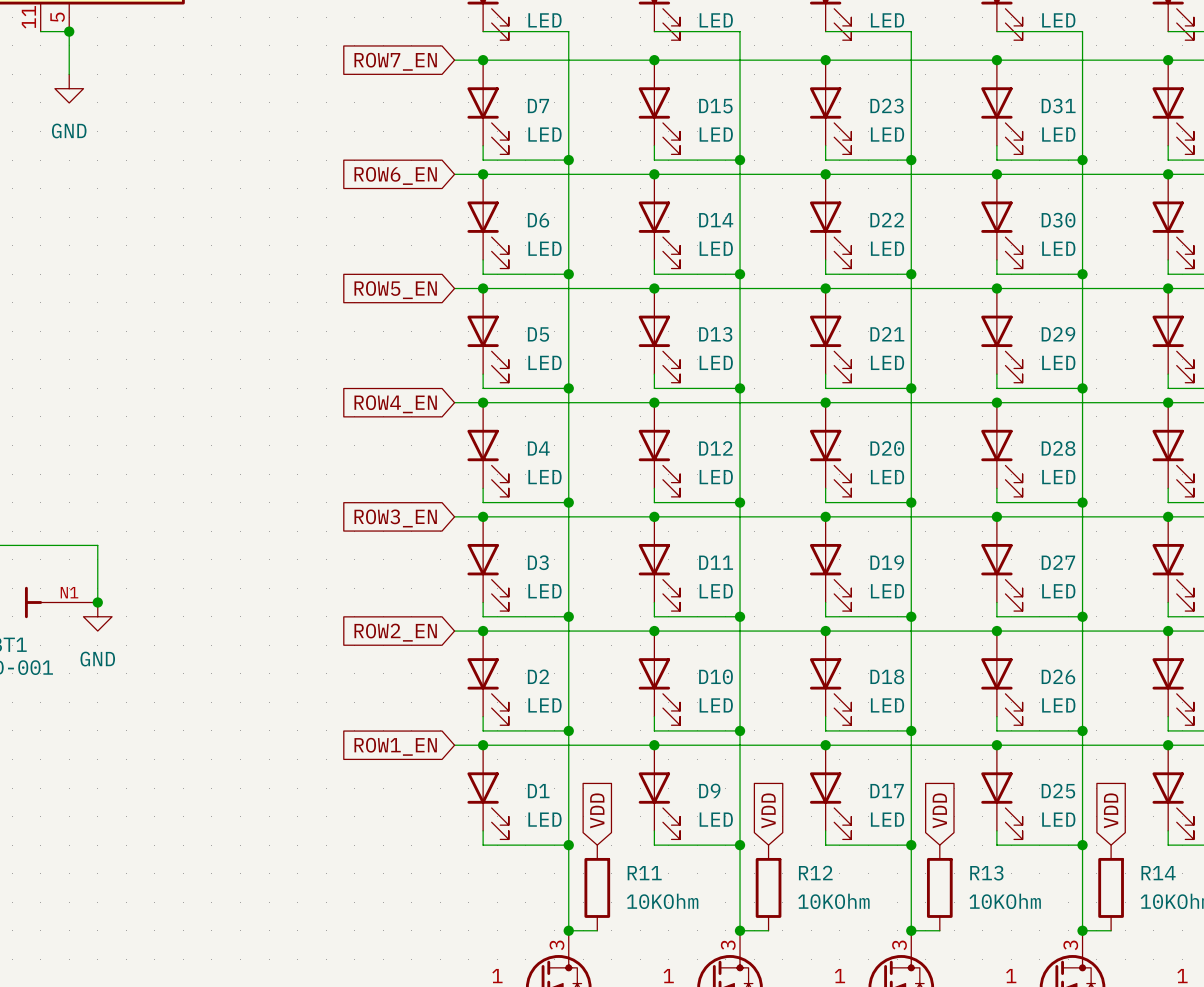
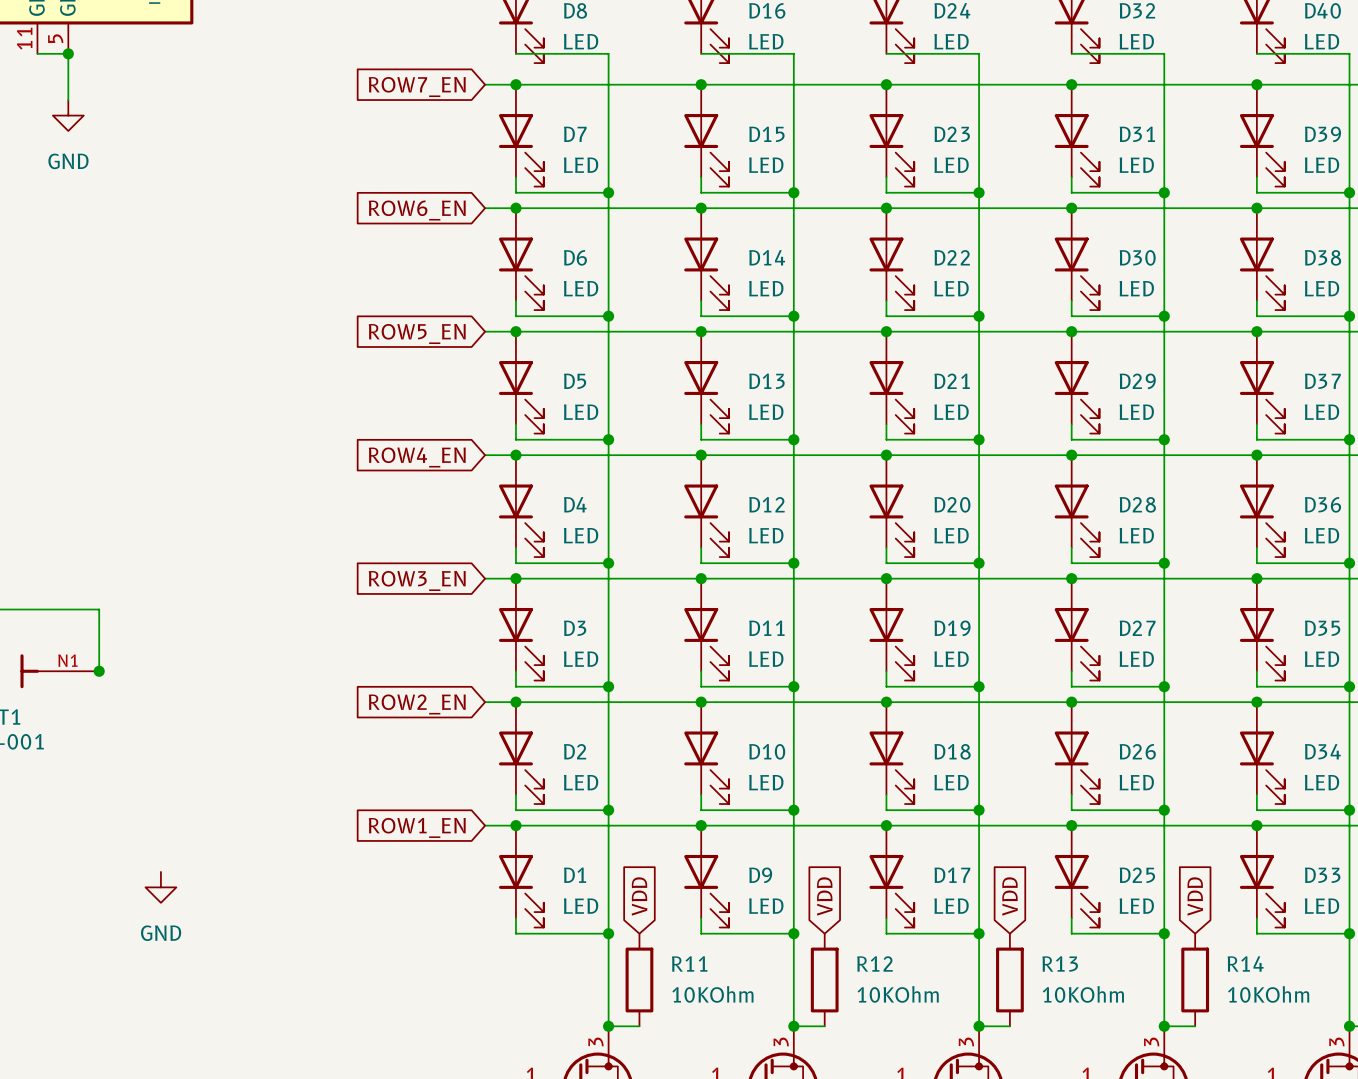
power symbol: GND (97, 616) -> none
power symbol: none -> GND (160, 887)

